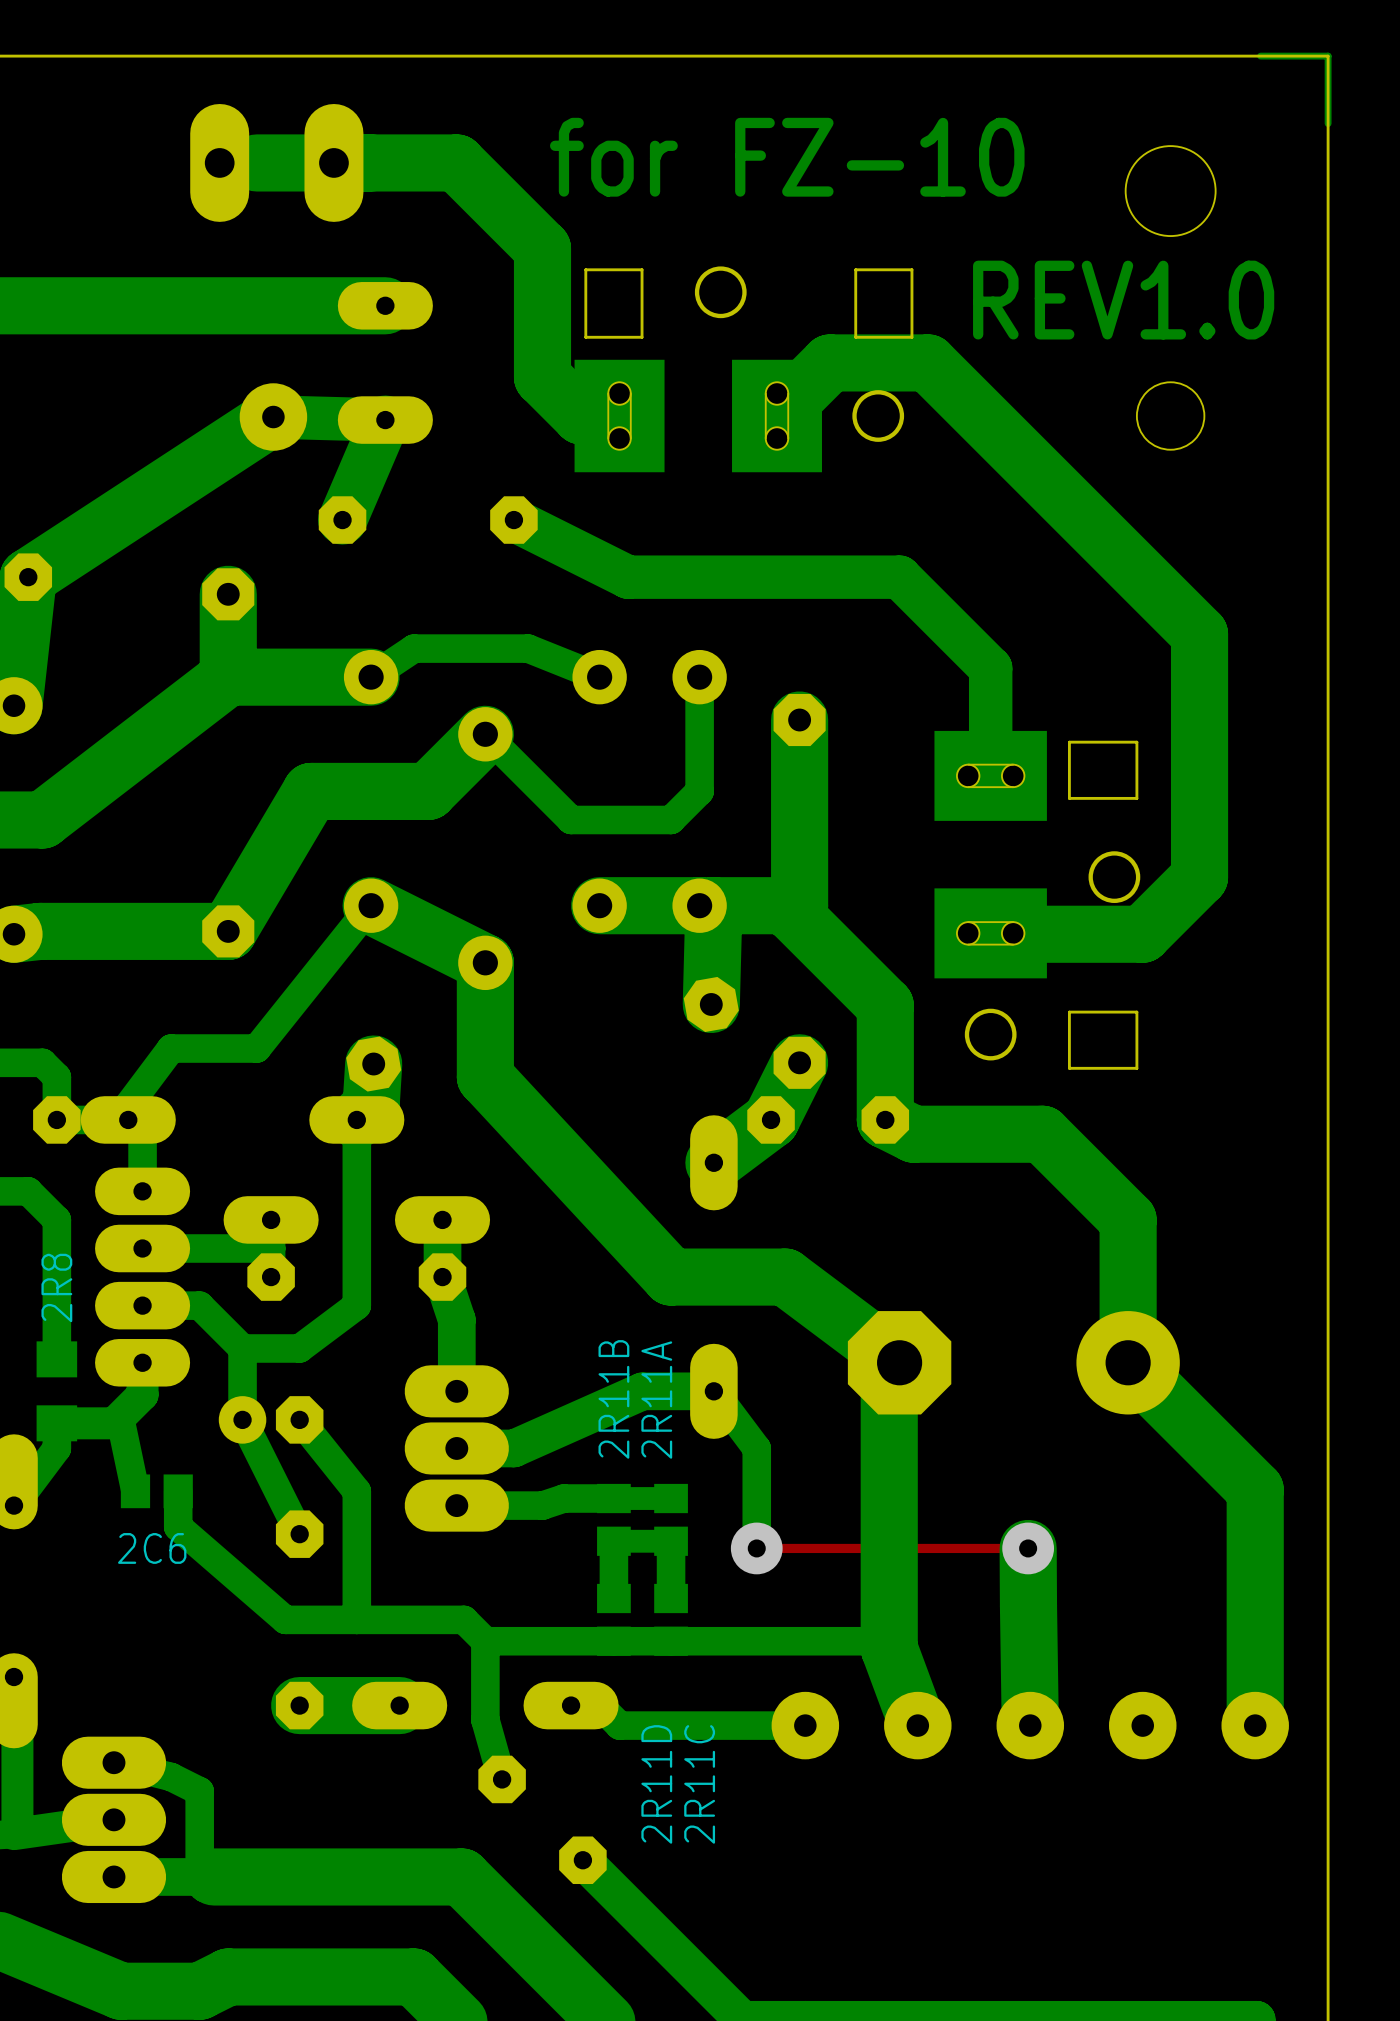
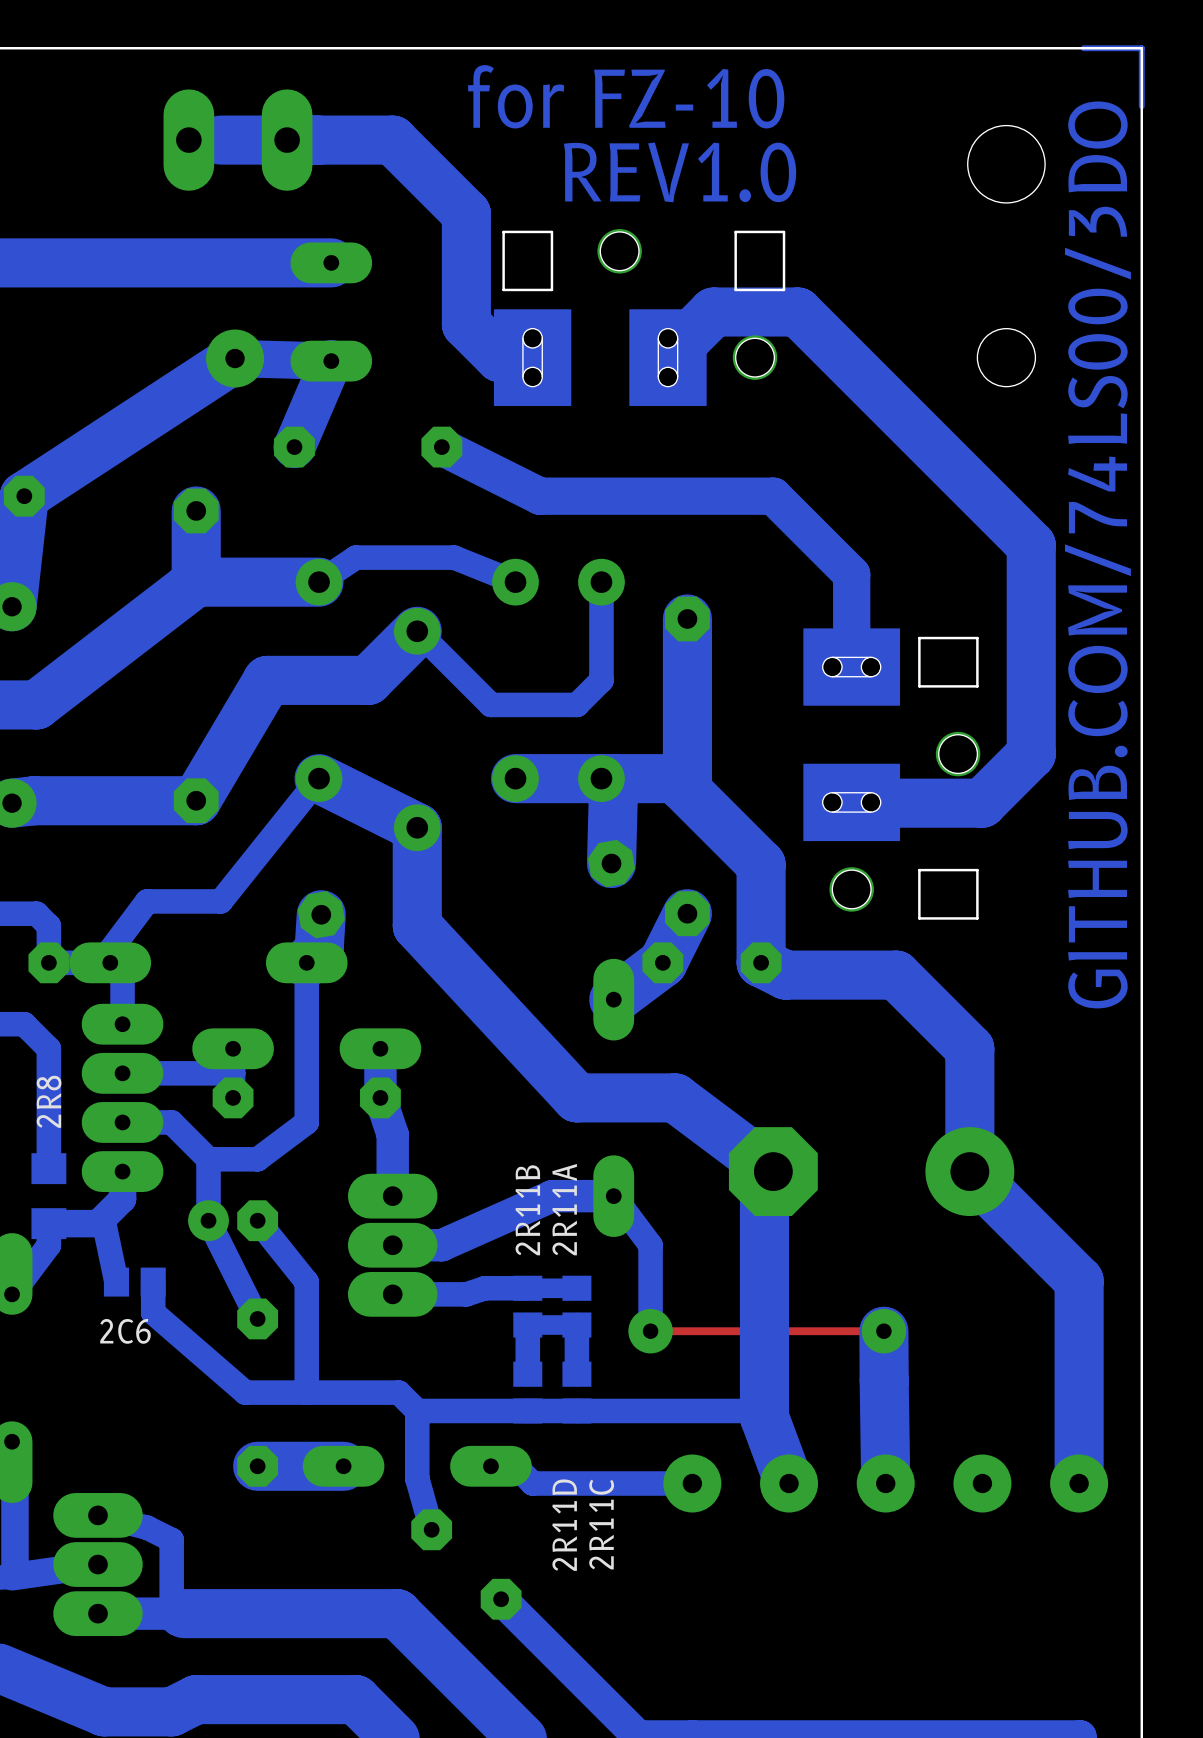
text position: for FZ-10 (787, 157) -> for FZ-10 (626, 96)
text position: REV1.0 (1123, 300) -> REV1.0 (680, 172)
text: none -> GITHUB.COM/74LS00/3DO (1097, 554)

